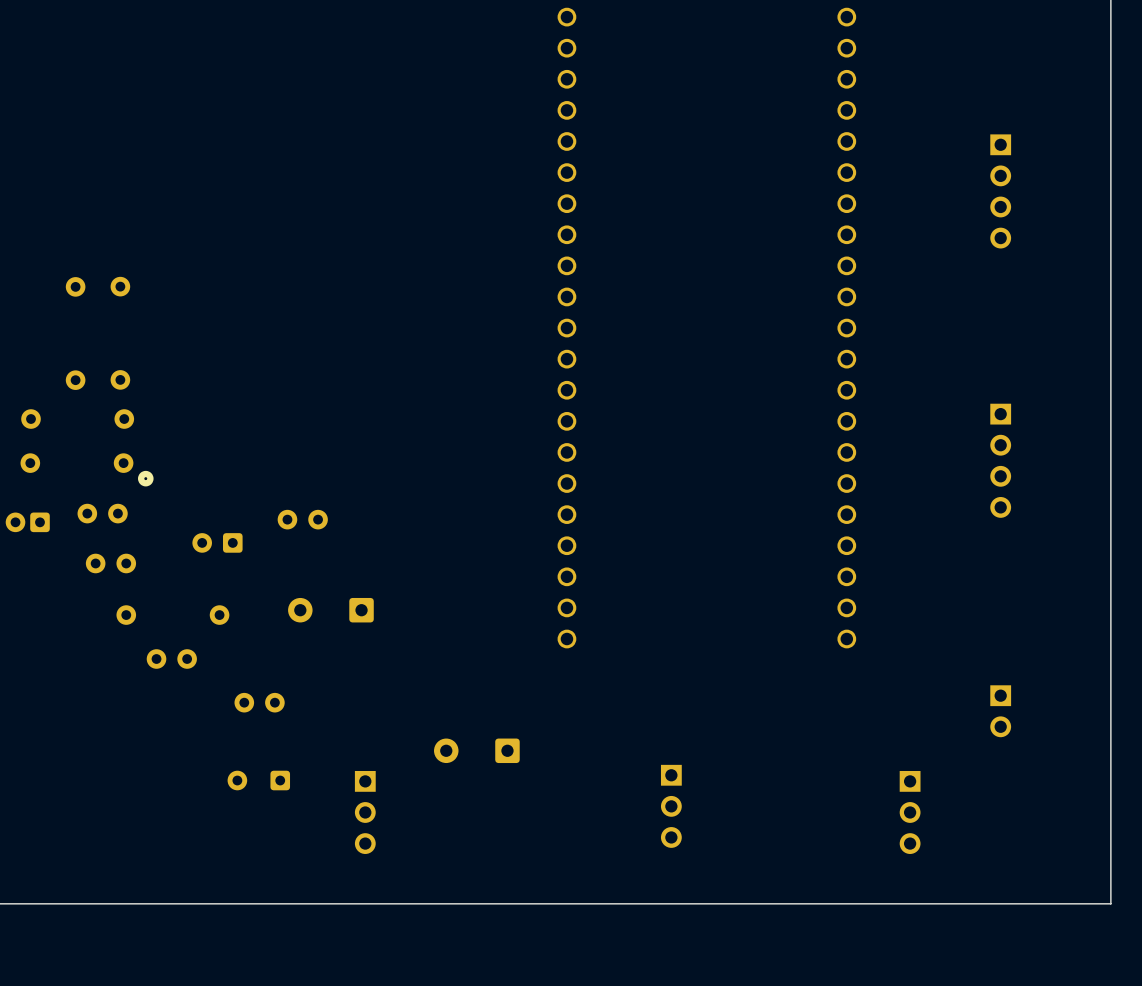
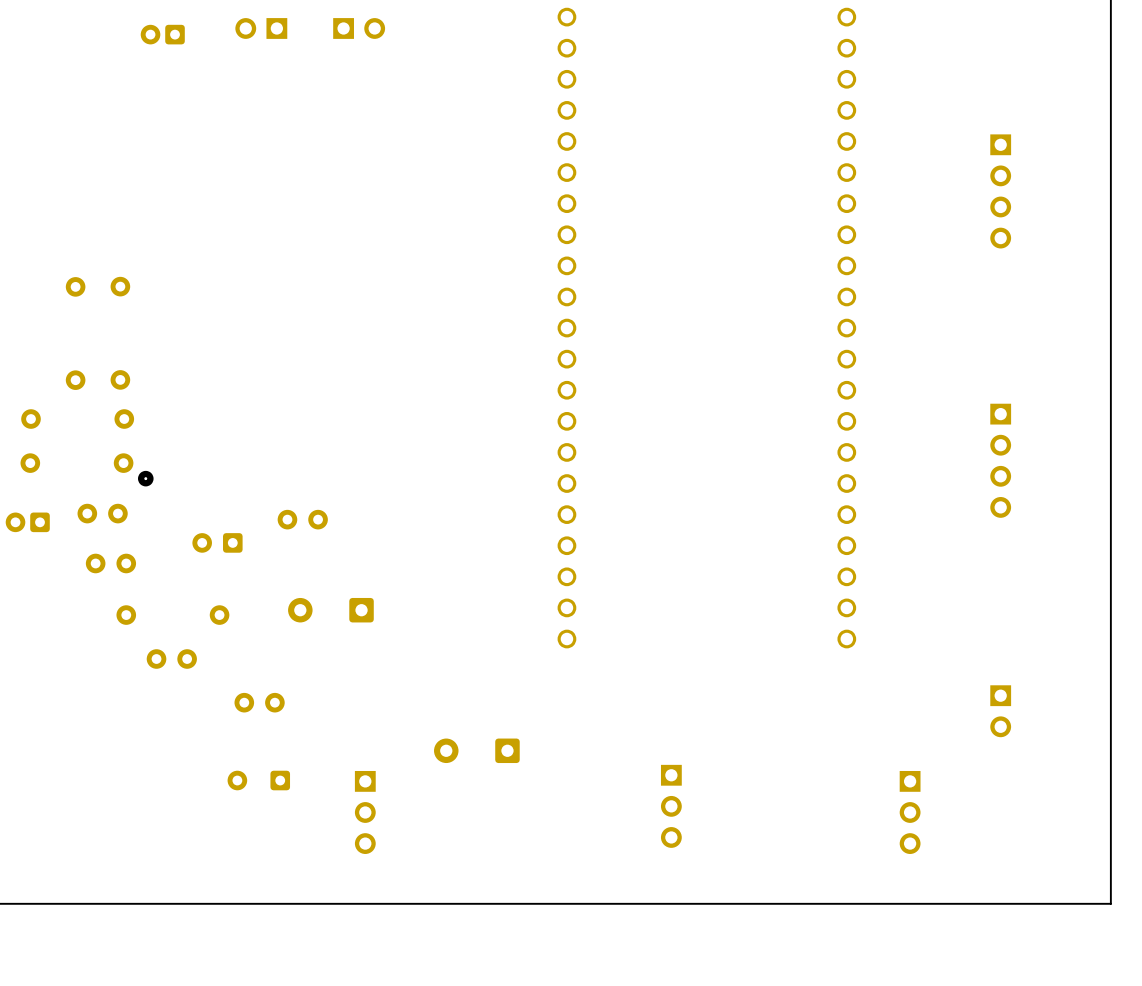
part: none -> (261, 28)
part: none -> (359, 28)
part: none -> (162, 34)

